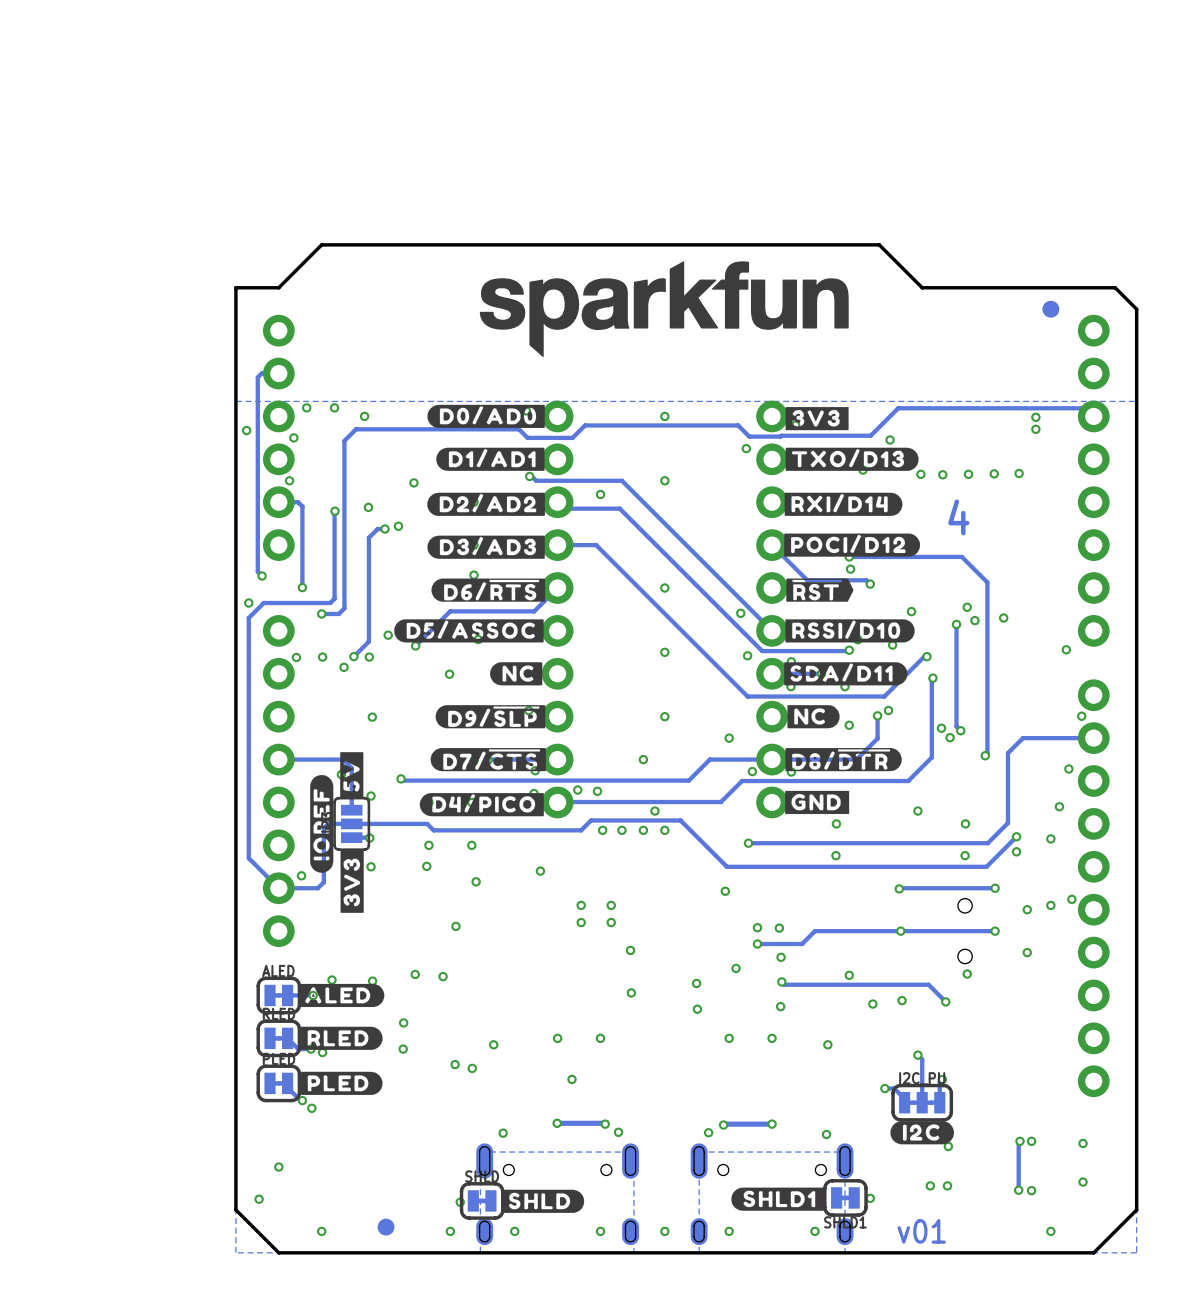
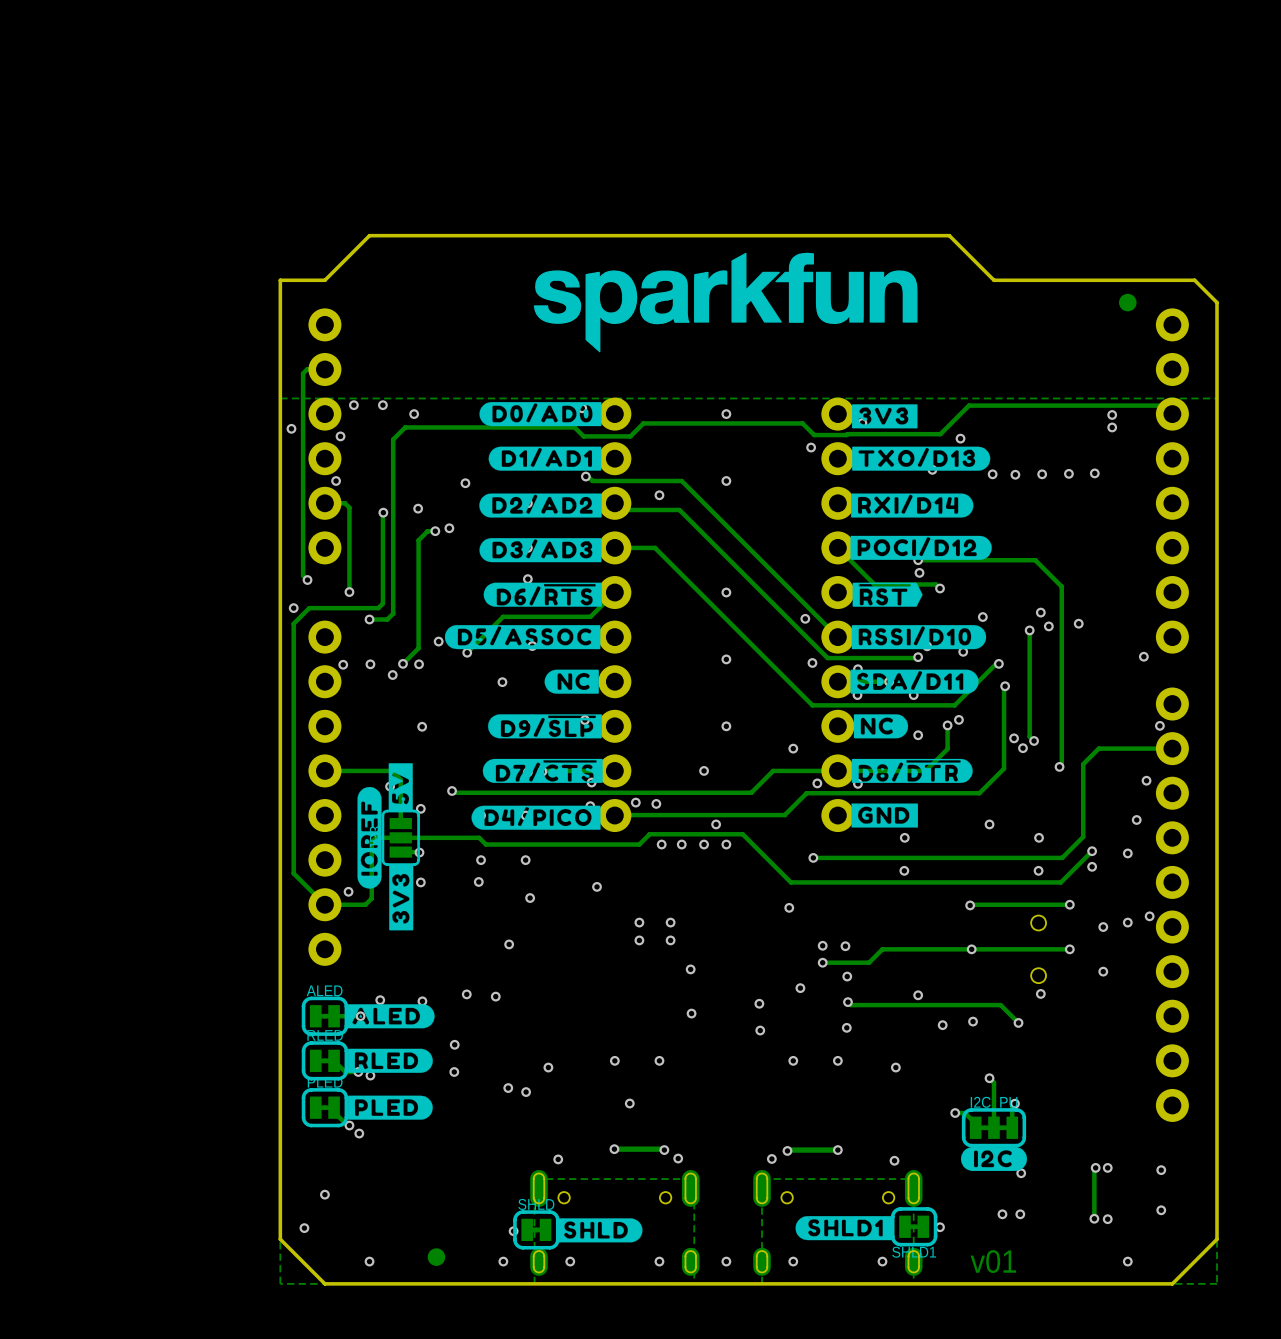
text: 4 (958, 517) -> none

